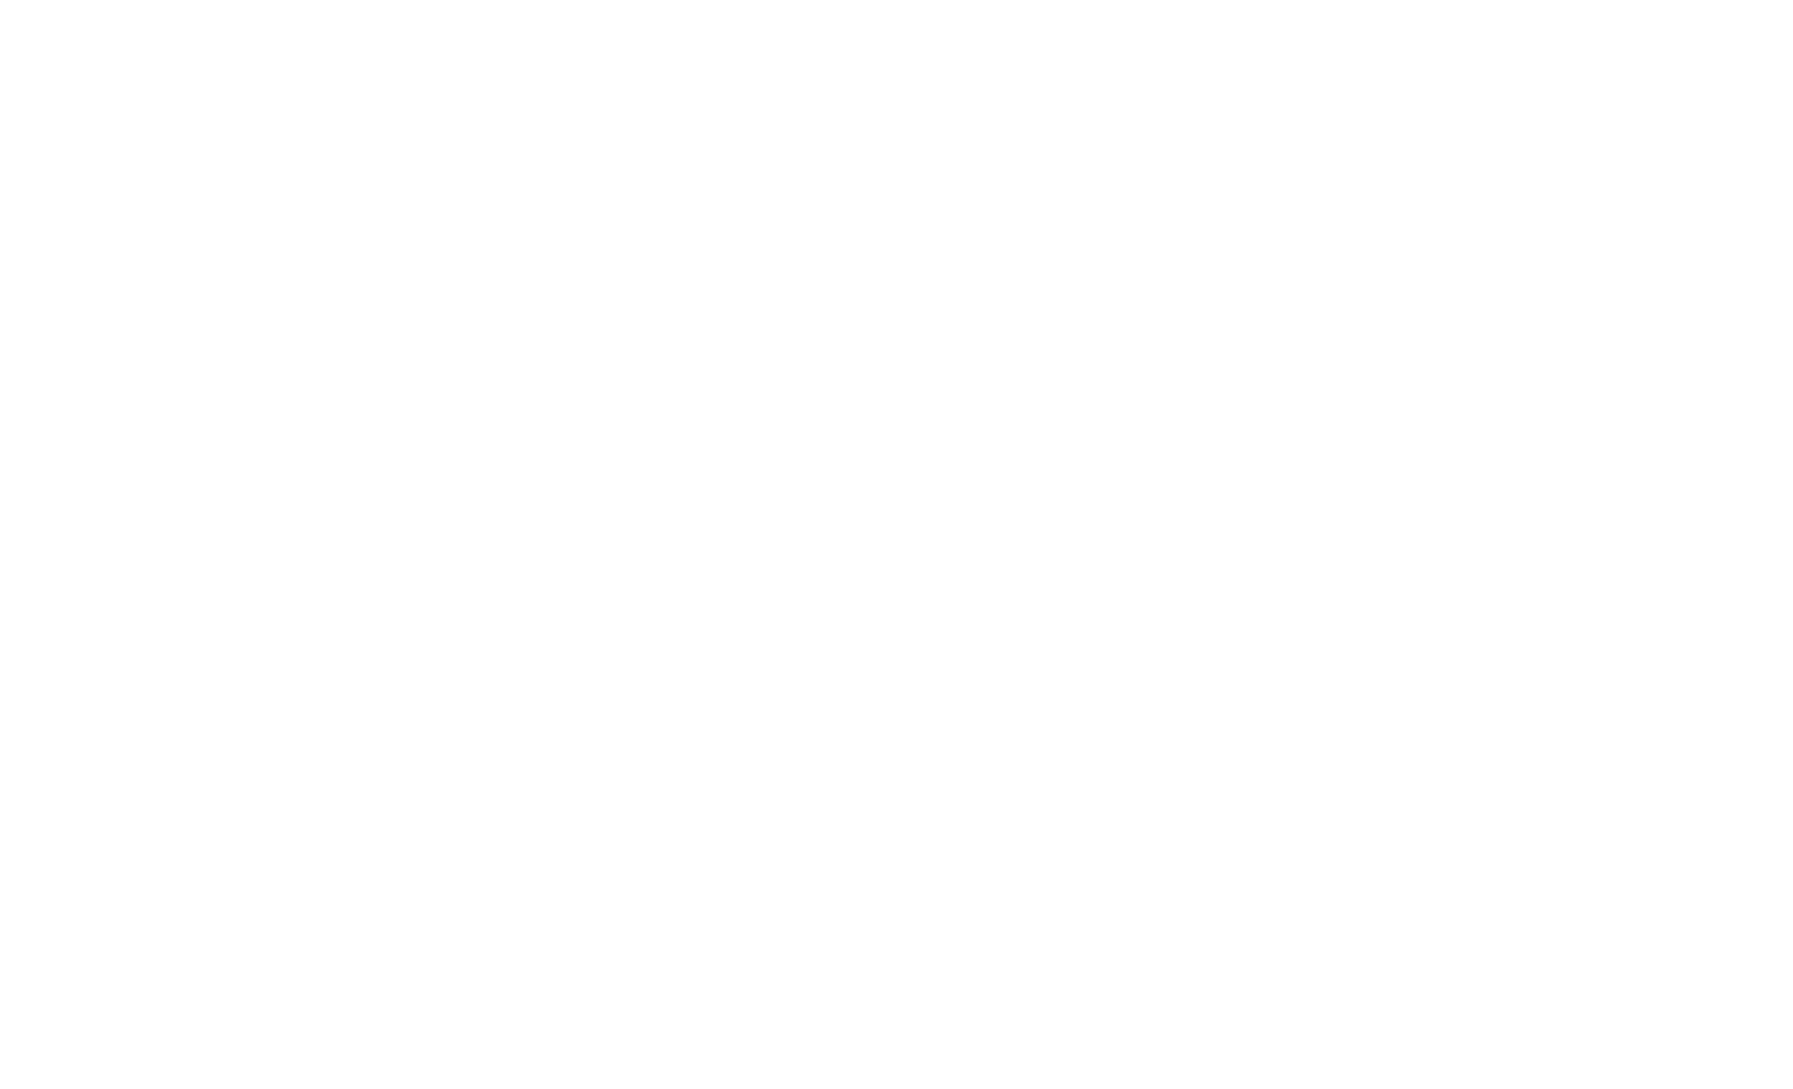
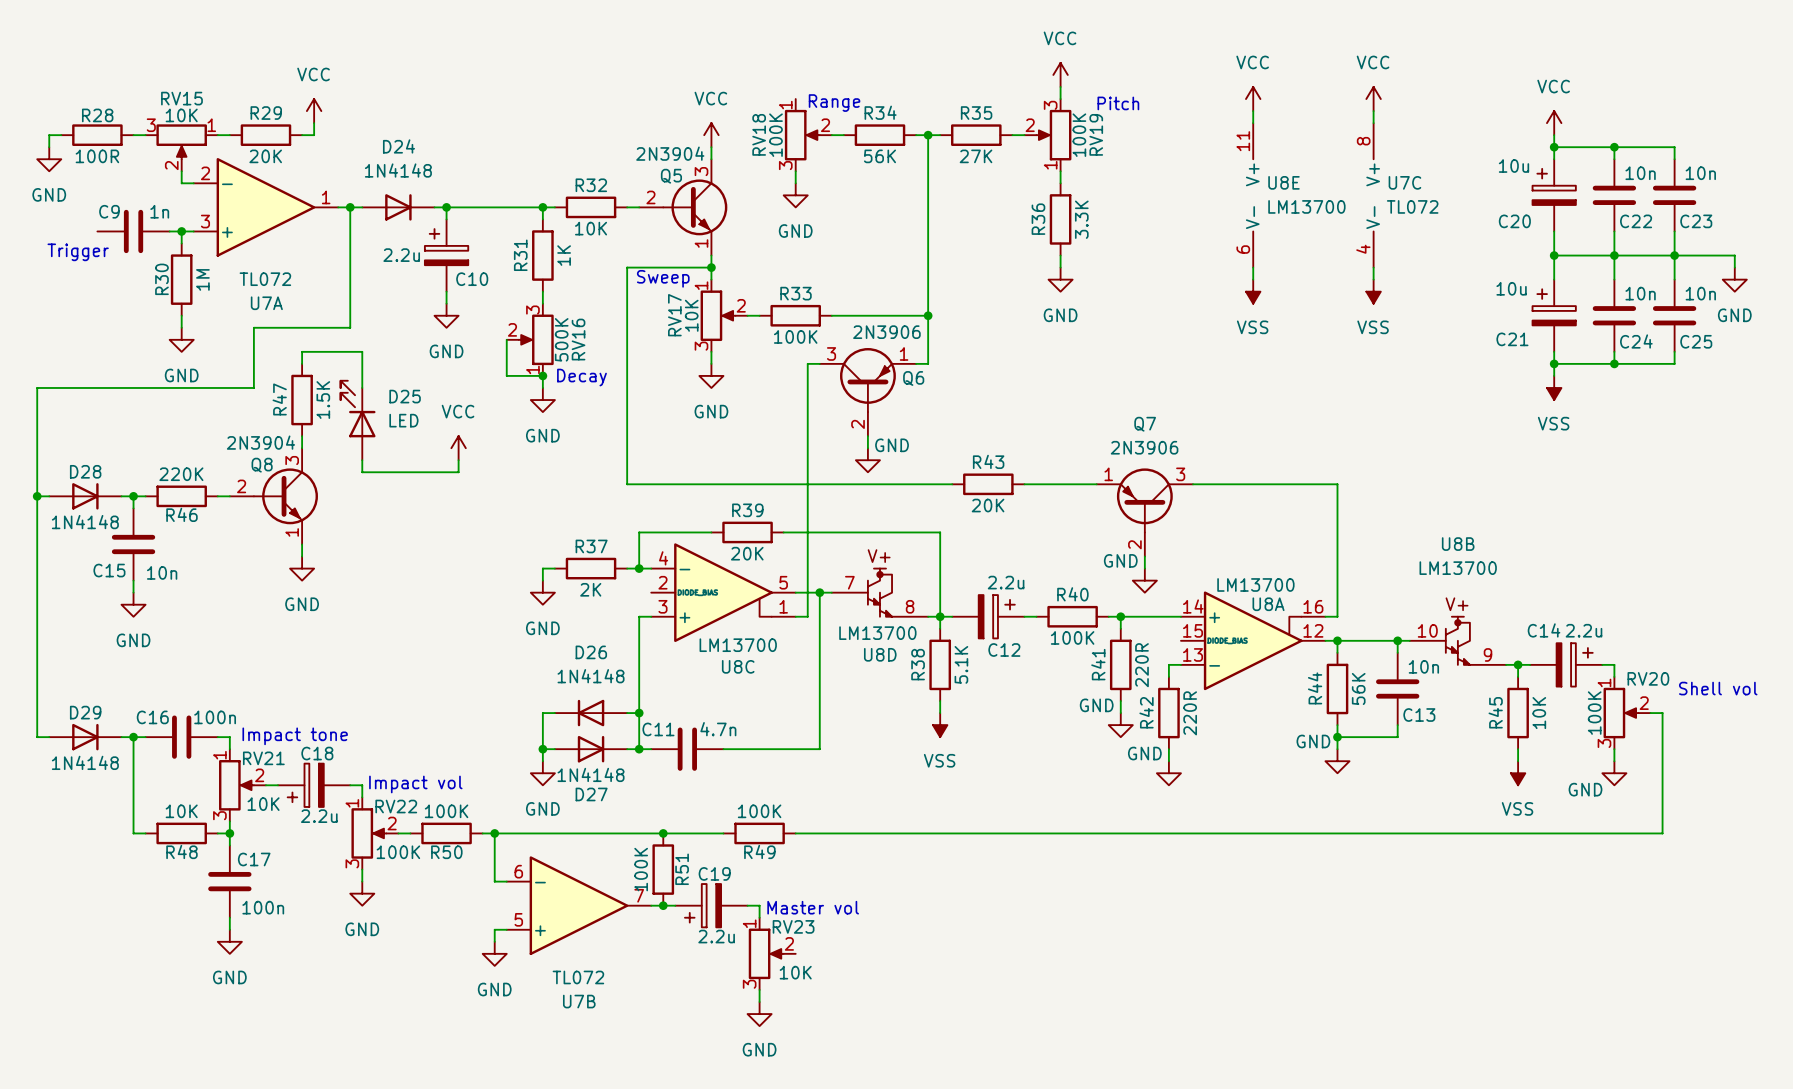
power symbol: none -> VCC (1060, 74)
wire: none -> (1060, 86) (1060, 99)
power symbol: none -> VCC (1253, 99)
power symbol: none -> VCC (1373, 99)
text: none -> Range (834, 103)
text: none -> Pitch (1118, 103)
power symbol: none -> VCC (314, 111)
wire: none -> (1253, 111) (1253, 123)
wire: none -> (1373, 111) (1373, 123)
wire: none -> (314, 123) (314, 135) (302, 135)
power symbol: none -> VCC (1554, 123)
wire: none -> (61, 135) (49, 135) (49, 147)
R28: none -> 100R (97, 135)
wire: none -> (133, 135) (145, 135)
wire: none -> (217, 135) (229, 135)
R29: none -> 20K (265, 135)
power symbol: none -> VCC (711, 135)
RV18: none -> 100K (808, 135)
wire: none -> (831, 135) (843, 135)
R34: none -> 56K (879, 135)
wire: none -> (916, 135) (940, 135)
wire: none -> (928, 135) (928, 363) (916, 363)
junction: none -> (928, 135)
R35: none -> 27K (976, 135)
wire: none -> (1012, 135) (1024, 135)
RV19: none -> 100K (1047, 135)
wire: none -> (1554, 135) (1554, 159)
RV15: none -> 10K (181, 147)
wire: none -> (711, 147) (711, 159)
wire: none -> (1554, 147) (1674, 147) (1674, 159)
junction: none -> (1554, 147)
wire: none -> (1614, 147) (1614, 159)
junction: none -> (1614, 147)
power symbol: none -> GND (49, 159)
wire: none -> (181, 171) (181, 183) (193, 183)
wire: none -> (795, 171) (795, 183)
wire: none -> (1060, 171) (1060, 183)
power symbol: none -> GND (795, 195)
U8E: none -> LM13700 (1253, 195)
U7C: none -> TL072 (1373, 195)
C20: none -> 10u (1554, 195)
C22: none -> 10n (1614, 195)
C23: none -> 10n (1674, 195)
U7A: none -> TL072 (265, 207)
wire: none -> (338, 207) (362, 207)
wire: none -> (350, 207) (350, 327) (253, 327) (253, 387) (37, 387) (37, 737) (49, 737)
junction: none -> (350, 207)
D24: none -> 1N4148 (398, 207)
wire: none -> (434, 207) (554, 207)
wire: none -> (446, 207) (446, 219)
junction: none -> (446, 207)
wire: none -> (542, 207) (542, 219)
junction: none -> (542, 207)
R32: none -> 10K (591, 207)
wire: none -> (627, 207) (639, 207)
Q5: none -> 2N3904 (683, 207)
R36: none -> 3.3K (1060, 219)
C9: none -> 1n (133, 231)
wire: none -> (169, 231) (193, 231)
wire: none -> (181, 231) (181, 243)
junction: none -> (181, 231)
wire: none -> (1554, 231) (1554, 279)
wire: none -> (1614, 231) (1614, 279)
wire: none -> (1674, 231) (1674, 279)
text: none -> Trigger (78, 252)
C10: none -> 2.2u (446, 255)
R31: none -> 1K (542, 255)
wire: none -> (711, 255) (711, 279)
wire: none -> (1060, 255) (1060, 267)
wire: none -> (1554, 255) (1734, 255) (1734, 267)
junction: none -> (1554, 255)
junction: none -> (1614, 255)
junction: none -> (1674, 255)
wire: none -> (711, 267) (627, 267) (627, 484) (952, 484)
junction: none -> (711, 267)
wire: none -> (1253, 267) (1253, 279)
wire: none -> (1373, 267) (1373, 279)
text: none -> Sweep (663, 278)
R30: none -> 1M (181, 279)
power symbol: none -> GND (1060, 279)
power symbol: none -> GND (1734, 279)
wire: none -> (446, 291) (446, 303)
wire: none -> (542, 291) (542, 303)
power symbol: none -> VSS (1253, 291)
power symbol: none -> VSS (1373, 291)
wire: none -> (181, 315) (181, 327)
power symbol: none -> GND (446, 315)
RV17: none -> 10K (724, 315)
wire: none -> (747, 315) (759, 315)
R33: none -> 100K (795, 315)
wire: none -> (831, 315) (928, 315)
junction: none -> (928, 315)
C21: none -> 10u (1554, 315)
C24: none -> 10n (1614, 315)
C25: none -> 10n (1674, 315)
power symbol: none -> GND (181, 339)
wire: none -> (506, 339) (506, 375) (542, 375) (542, 387)
RV16: none -> 500K (530, 339)
wire: none -> (711, 351) (711, 363)
wire: none -> (1554, 351) (1554, 375)
wire: none -> (1614, 351) (1614, 363)
wire: none -> (1674, 351) (1674, 363) (1554, 363)
wire: none -> (302, 363) (302, 351) (362, 351) (362, 387)
wire: none -> (819, 363) (807, 363) (807, 616) (795, 616)
junction: none -> (1554, 363)
junction: none -> (1614, 363)
junction: none -> (542, 375)
power symbol: none -> GND (711, 375)
text: none -> Decay (581, 377)
power symbol: none -> VSS (1554, 387)
Q6: none -> 2N3906 (867, 392)
R47: none -> 1.5K (302, 400)
power symbol: none -> GND (542, 400)
D25: none -> LED (358, 420)
wire: none -> (302, 436) (302, 448)
wire: none -> (867, 436) (867, 448)
power symbol: none -> VCC (458, 448)
wire: none -> (362, 460) (362, 472) (458, 472) (458, 460)
power symbol: none -> GND (867, 460)
R43: none -> 20K (988, 484)
wire: none -> (1024, 484) (1096, 484)
wire: none -> (1193, 484) (1337, 484) (1337, 616) (1325, 616)
wire: none -> (37, 496) (49, 496)
junction: none -> (37, 496)
D28: none -> 1N4148 (85, 496)
wire: none -> (121, 496) (145, 496)
wire: none -> (133, 496) (133, 508)
junction: none -> (133, 496)
R46: none -> 220K (181, 496)
wire: none -> (217, 496) (229, 496)
Q8: none -> 2N3904 (273, 496)
Q7: none -> 2N3906 (1144, 512)
wire: none -> (711, 532) (639, 532) (639, 568)
R39: none -> 20K (747, 532)
wire: none -> (783, 532) (940, 532) (940, 628)
C15: none -> 10n (133, 544)
wire: none -> (302, 544) (302, 556)
wire: none -> (1144, 556) (1144, 568)
power symbol: none -> GND (302, 568)
wire: none -> (554, 568) (542, 568) (542, 580)
R37: none -> 2K (591, 568)
wire: none -> (627, 568) (651, 568)
junction: none -> (639, 568)
wire: none -> (133, 580) (133, 592)
power symbol: none -> GND (1144, 580)
power symbol: none -> GND (542, 592)
U8C: none -> LM13700 (723, 592)
wire: none -> (795, 592) (831, 592)
wire: none -> (819, 592) (819, 749) (723, 749)
junction: none -> (819, 592)
U8D: none -> LM13700 (879, 592)
power symbol: none -> GND (133, 604)
wire: none -> (651, 616) (639, 616) (639, 749)
wire: none -> (928, 616) (952, 616)
junction: none -> (940, 616)
C12: none -> 2.2u (988, 616)
wire: none -> (1024, 616) (1036, 616)
R40: none -> 100K (1072, 616)
wire: none -> (1108, 616) (1180, 616)
wire: none -> (1120, 616) (1120, 628)
junction: none -> (1120, 616)
U8A: none -> LM13700 (1253, 640)
wire: none -> (1325, 640) (1409, 640)
wire: none -> (1337, 640) (1337, 652)
junction: none -> (1337, 640)
wire: none -> (1397, 640) (1397, 652)
junction: none -> (1397, 640)
U8B: none -> LM13700 (1457, 640)
R38: none -> 5.1K (940, 664)
R41: none -> 220R (1120, 664)
wire: none -> (1180, 664) (1168, 664) (1168, 676)
wire: none -> (1506, 664) (1530, 664)
wire: none -> (1518, 664) (1518, 676)
junction: none -> (1518, 664)
C14: none -> 2.2u (1566, 664)
wire: none -> (1602, 664) (1614, 664) (1614, 676)
R44: none -> 56K (1337, 688)
C13: none -> 10n (1397, 688)
text: none -> Shell vol (1718, 688)
wire: none -> (940, 701) (940, 713)
wire: none -> (1120, 701) (1120, 713)
wire: none -> (554, 713) (542, 713) (542, 761)
D26: none -> 1N4148 (591, 713)
wire: none -> (627, 713) (639, 713)
junction: none -> (639, 713)
R42: none -> 220R (1168, 713)
R45: none -> 10K (1518, 713)
RV20: none -> 100K (1627, 713)
wire: none -> (1650, 713) (1662, 713) (1662, 833) (795, 833)
power symbol: none -> VSS (940, 725)
power symbol: none -> GND (1120, 725)
wire: none -> (1337, 725) (1337, 749)
wire: none -> (1397, 725) (1397, 737) (1337, 737)
text: none -> Impact tone (295, 736)
D29: none -> 1N4148 (85, 737)
wire: none -> (121, 737) (145, 737)
wire: none -> (133, 737) (133, 833) (145, 833)
junction: none -> (133, 737)
C16: none -> 100n (181, 737)
wire: none -> (217, 737) (229, 737) (229, 749)
junction: none -> (1337, 737)
wire: none -> (542, 749) (554, 749)
junction: none -> (542, 749)
D27: none -> 1N4148 (591, 749)
wire: none -> (627, 749) (651, 749)
junction: none -> (639, 749)
C11: none -> 4.7n (687, 749)
wire: none -> (1168, 749) (1168, 761)
wire: none -> (1518, 749) (1518, 761)
wire: none -> (1614, 749) (1614, 761)
power symbol: none -> GND (1337, 761)
power symbol: none -> GND (542, 773)
power symbol: none -> GND (1168, 773)
power symbol: none -> VSS (1518, 773)
power symbol: none -> GND (1614, 773)
text: none -> Impact vol (415, 784)
RV21: none -> 10K (242, 785)
wire: none -> (265, 785) (278, 785)
C18: none -> 2.2u (314, 785)
wire: none -> (350, 785) (362, 785) (362, 797)
wire: none -> (229, 821) (229, 845)
R48: none -> 10K (181, 833)
wire: none -> (217, 833) (229, 833)
junction: none -> (229, 833)
RV22: none -> 100K (374, 833)
wire: none -> (398, 833) (410, 833)
R50: none -> 100K (446, 833)
wire: none -> (482, 833) (723, 833)
wire: none -> (494, 833) (494, 881) (506, 881)
junction: none -> (494, 833)
junction: none -> (663, 833)
R49: none -> 100K (759, 833)
wire: none -> (362, 869) (362, 881)
R51: none -> 100K (663, 869)
C17: none -> 100n (229, 881)
power symbol: none -> GND (362, 893)
U7B: none -> TL072 (578, 905)
wire: none -> (651, 905) (675, 905)
junction: none -> (663, 905)
C19: none -> 2.2u (711, 905)
wire: none -> (747, 905) (759, 905) (759, 917)
text: none -> Master vol (813, 907)
wire: none -> (229, 917) (229, 929)
wire: none -> (506, 929) (494, 929) (494, 941)
power symbol: none -> GND (229, 941)
power symbol: none -> GND (494, 953)
RV23: none -> 10K (772, 953)
wire: none -> (759, 989) (759, 1002)
power symbol: none -> GND (759, 1014)

